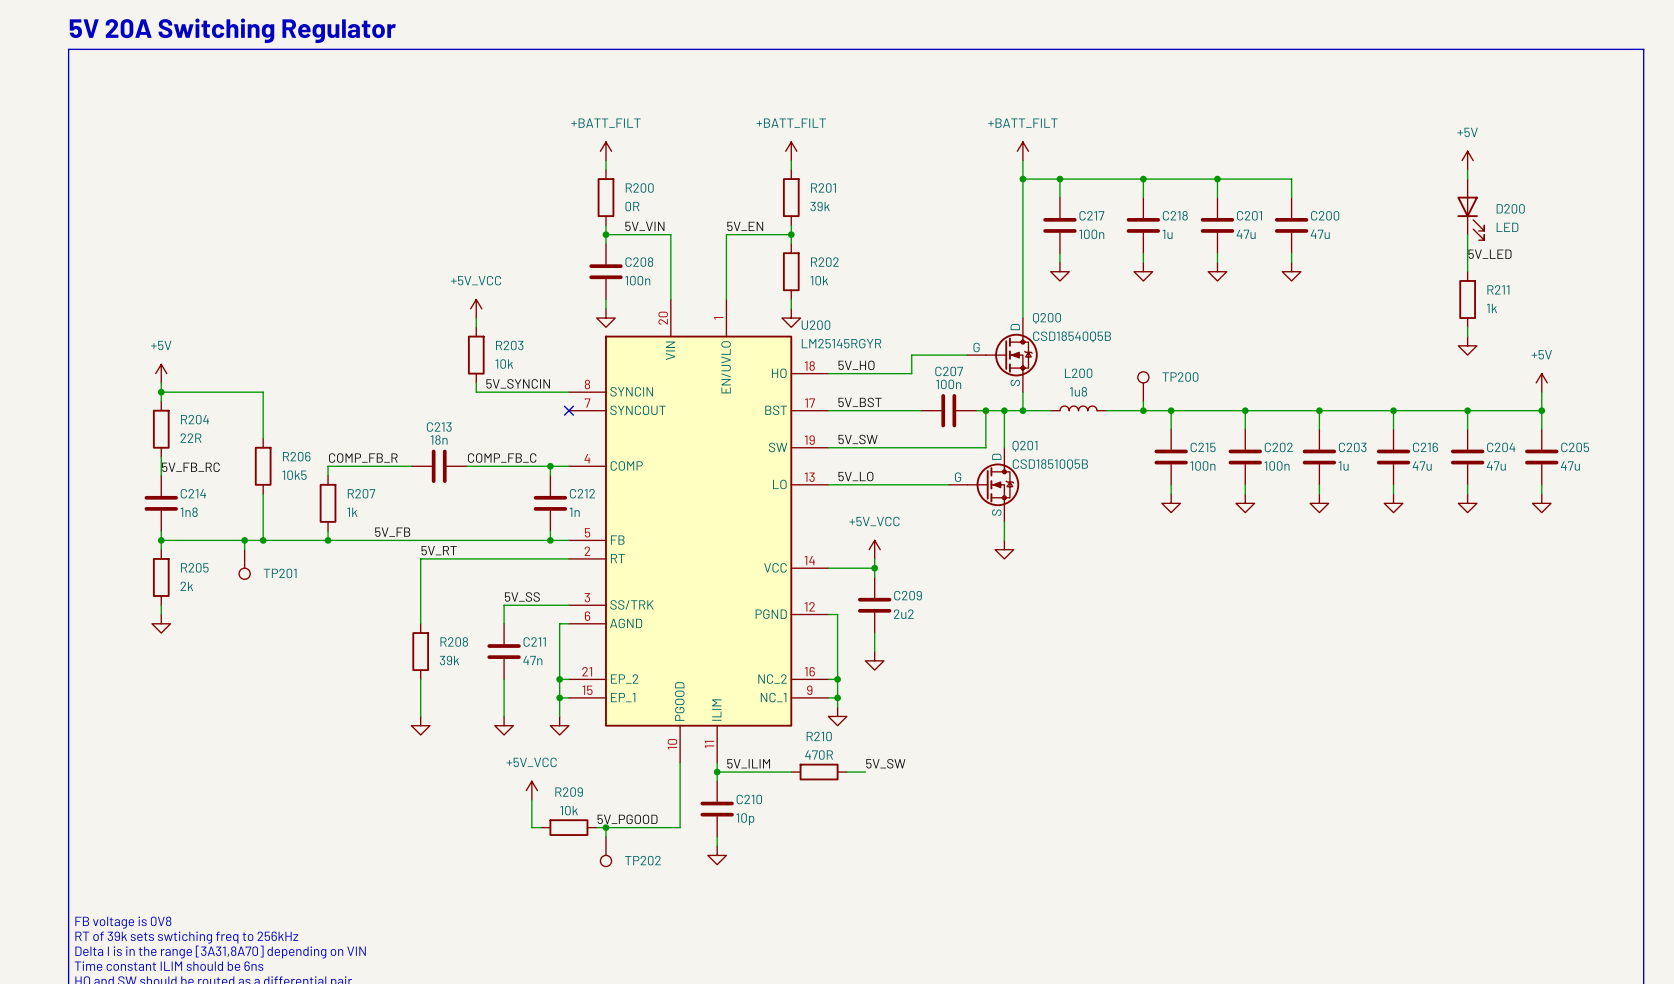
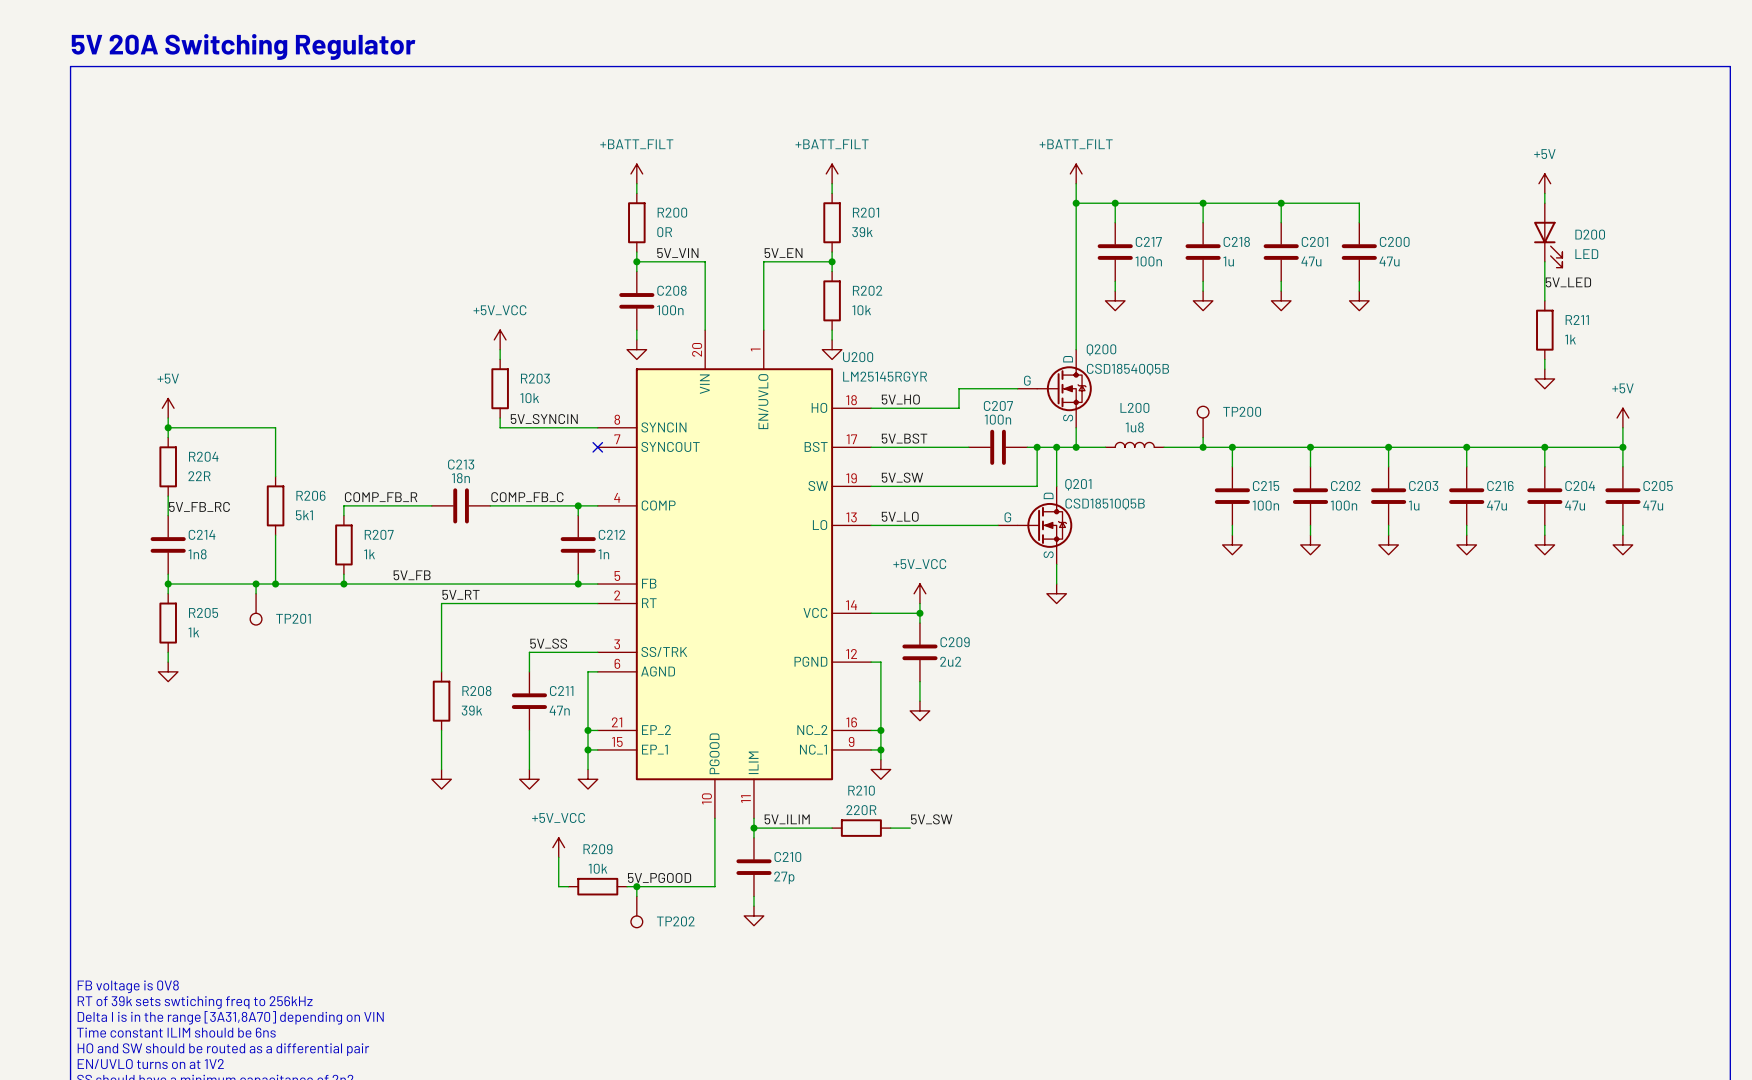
R206 value: 10k5 (294, 475) -> 5k1 (304, 515)
R205 value: 2k (186, 586) -> 1k (193, 632)
R210 value: 470R (819, 755) -> 220R (861, 810)
C210 value: 10p (745, 819) -> 27p (784, 877)

